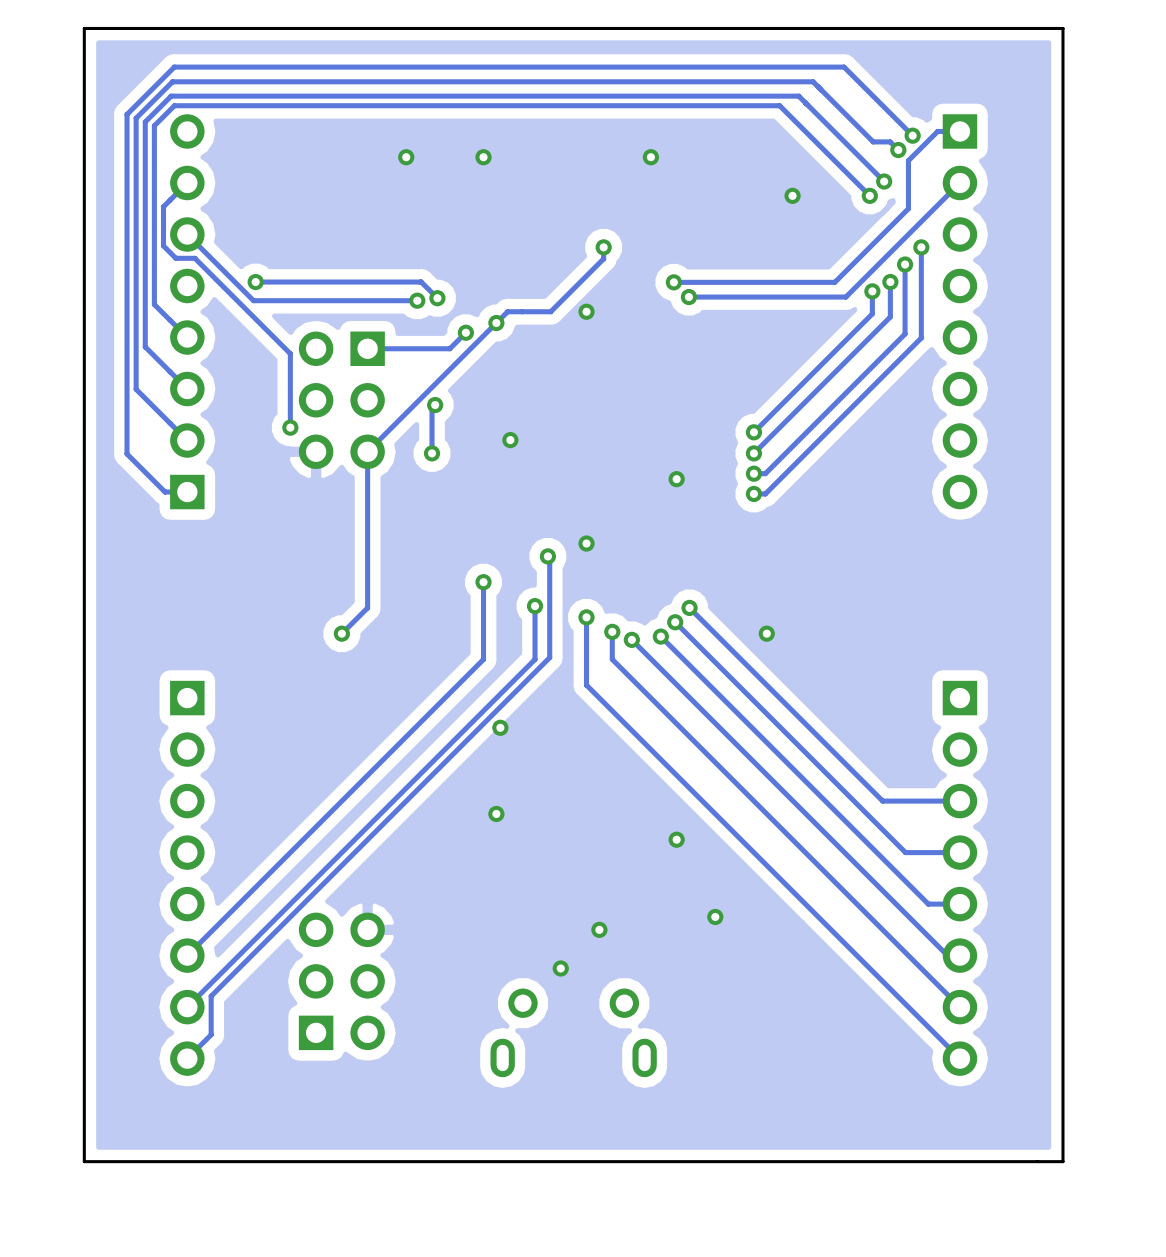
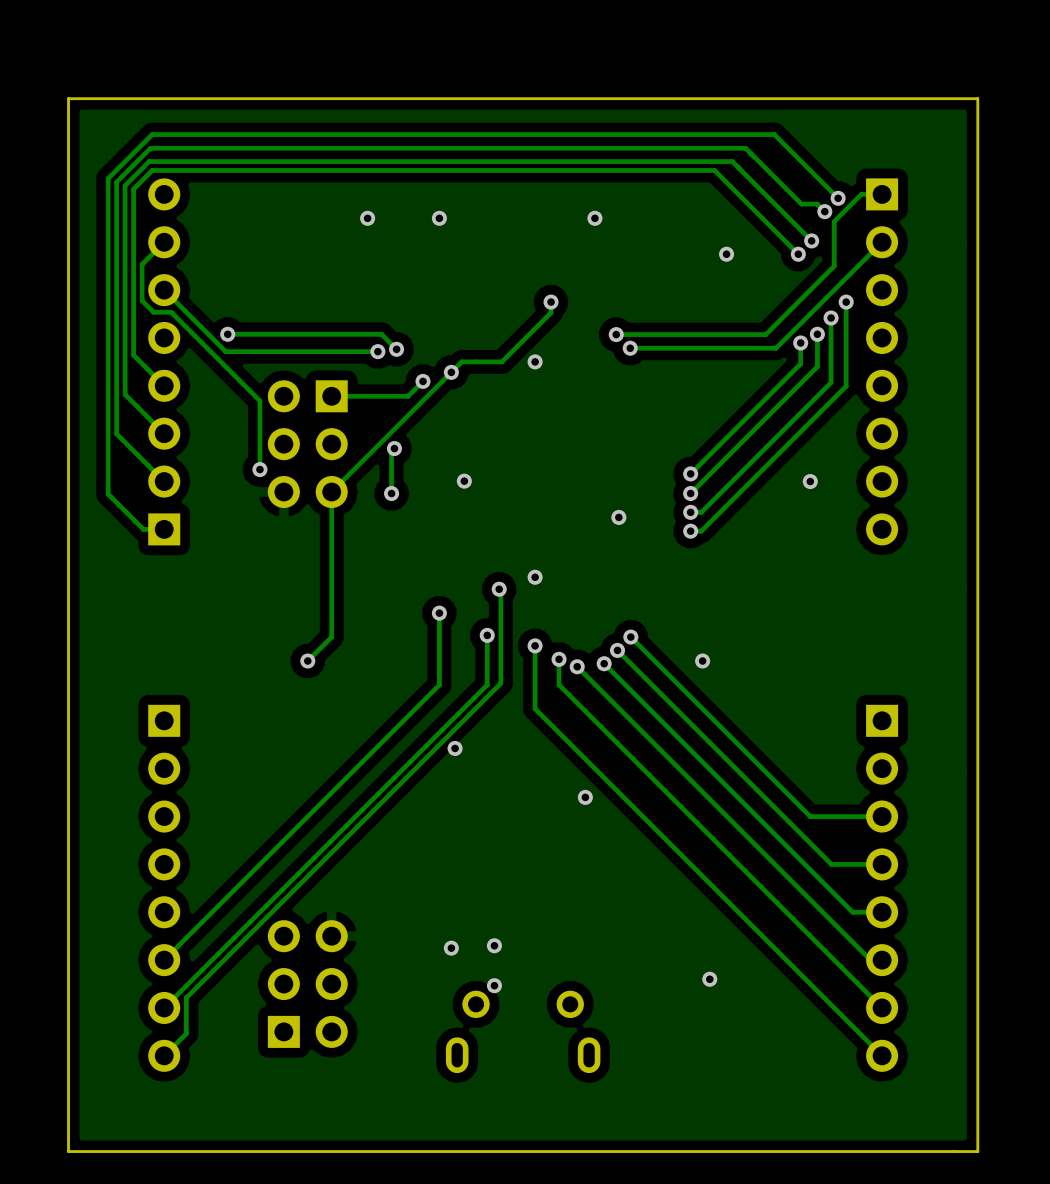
via: none -> (810, 481)
via: (496, 813) -> none
via position: (676, 839) -> (585, 797)
via: (715, 916) -> none
via: (599, 929) -> none
via: none -> (494, 945)
via: none -> (451, 948)
via: (560, 968) -> none
via: none -> (709, 979)
via: none -> (494, 985)

